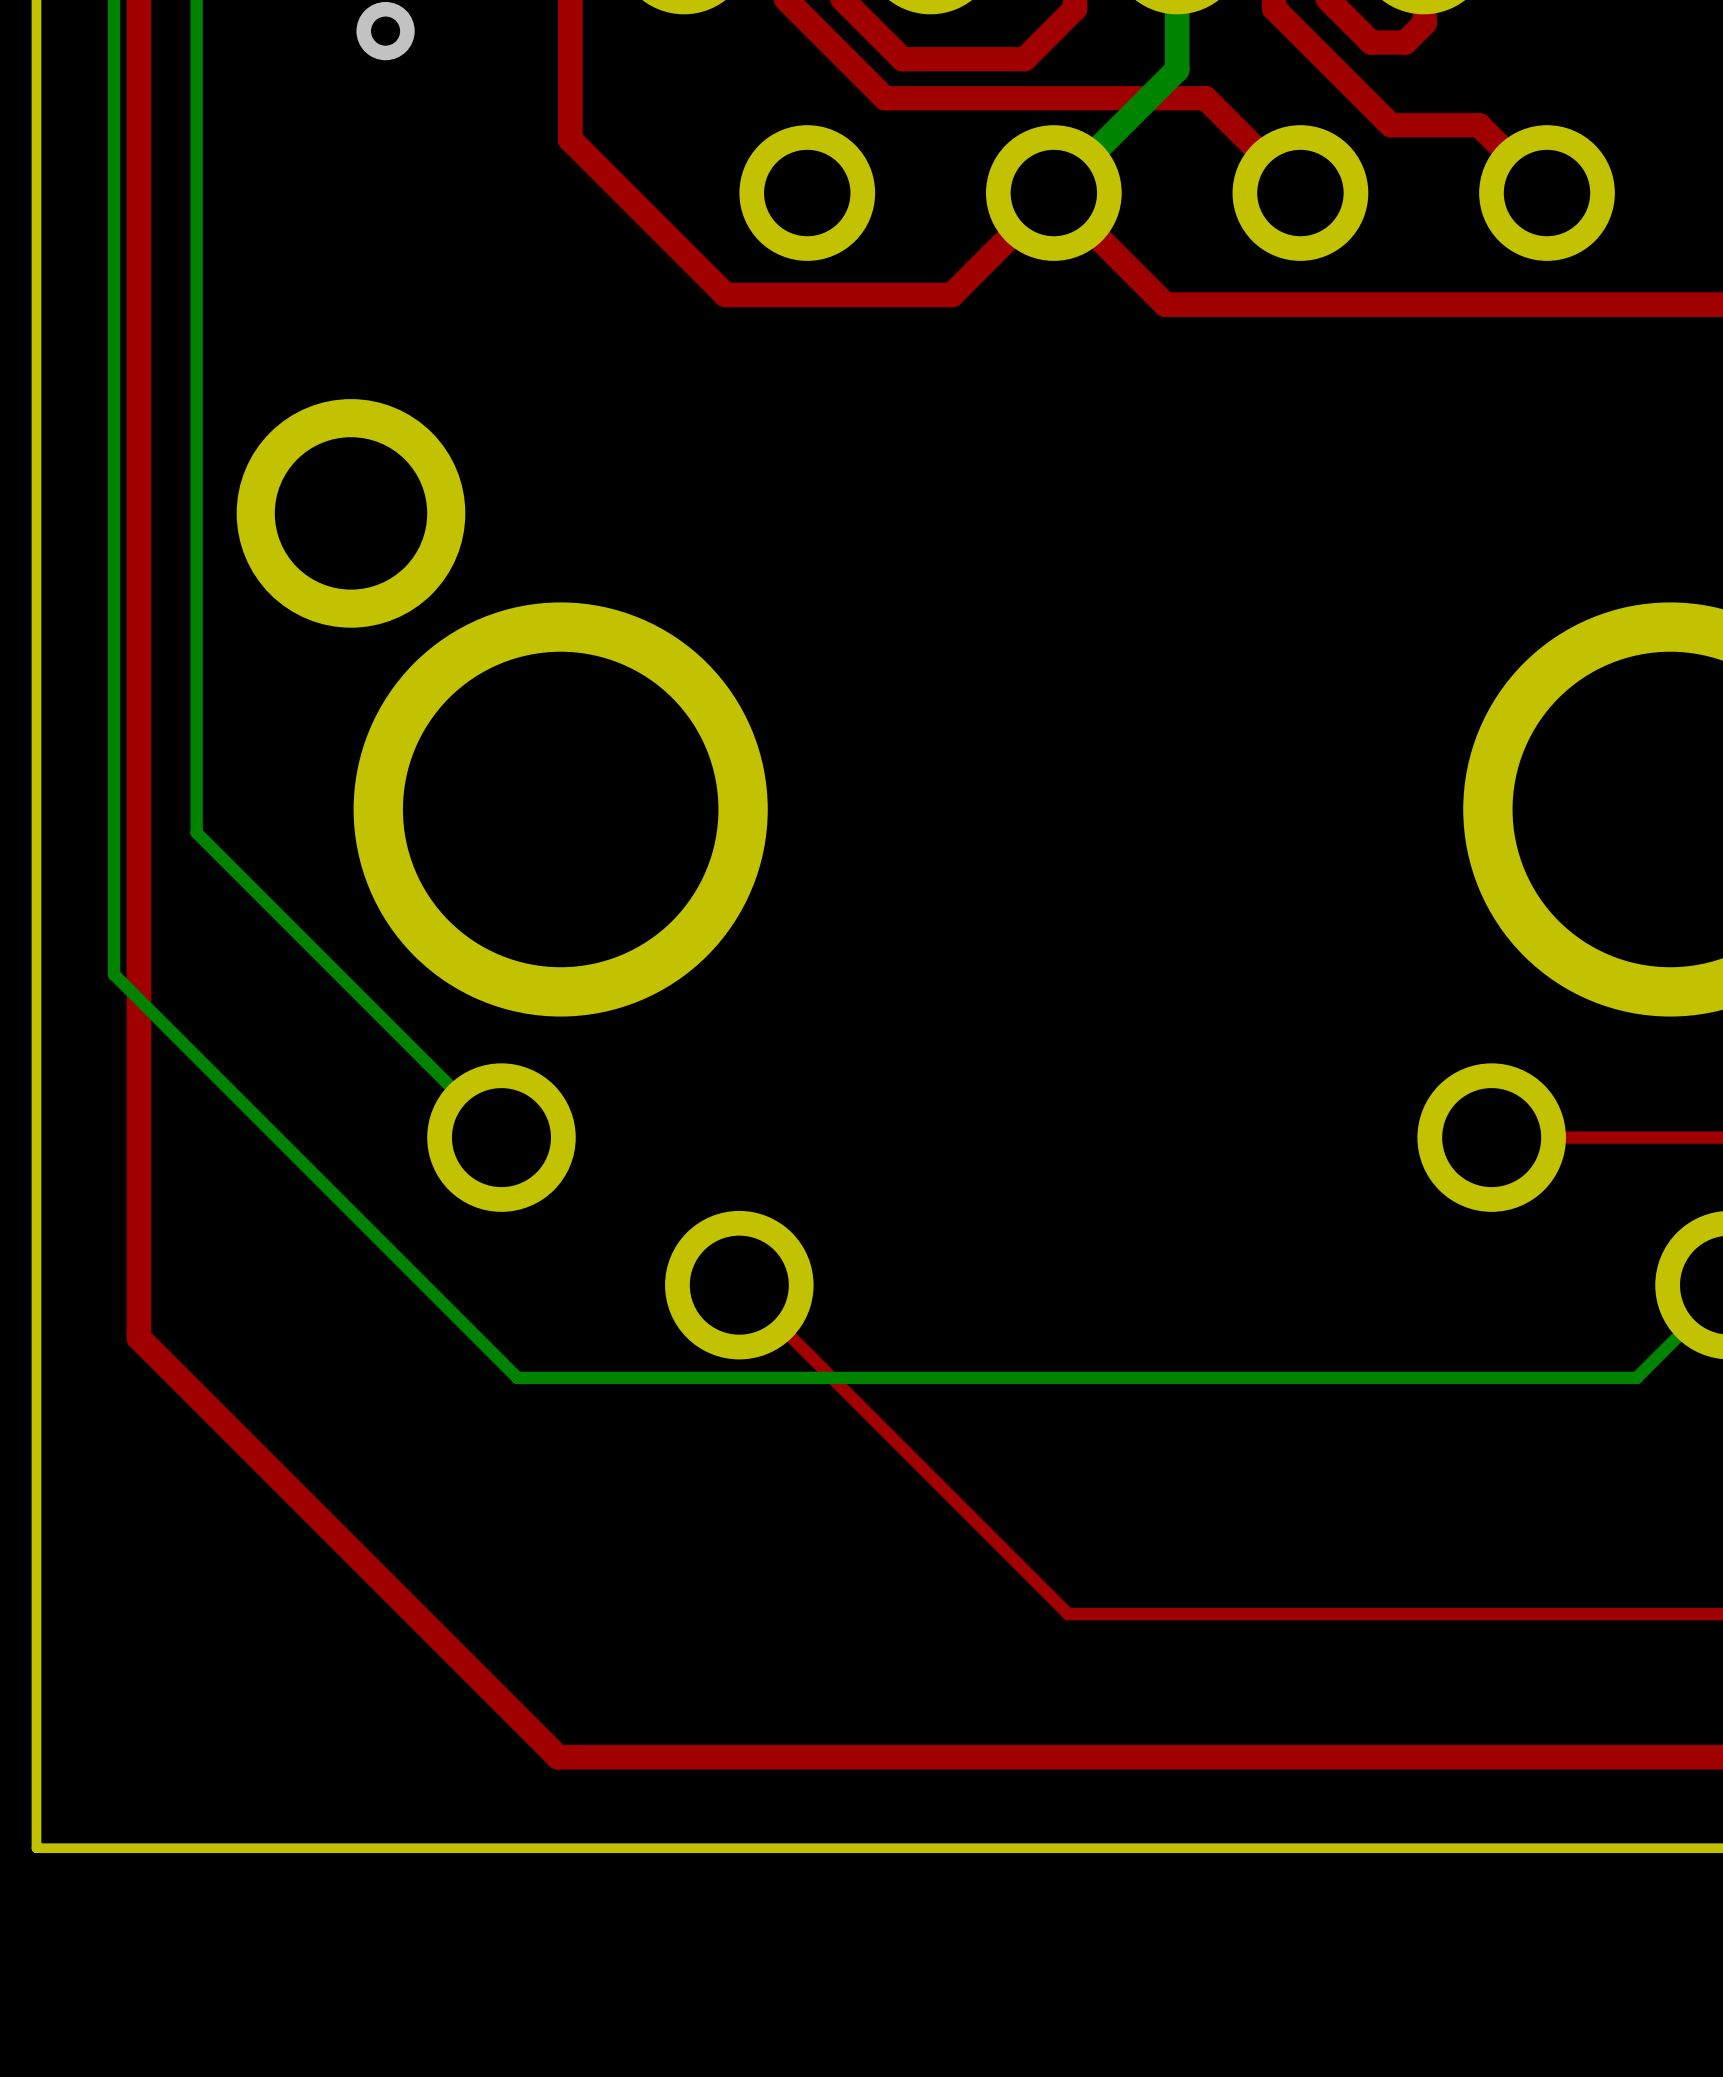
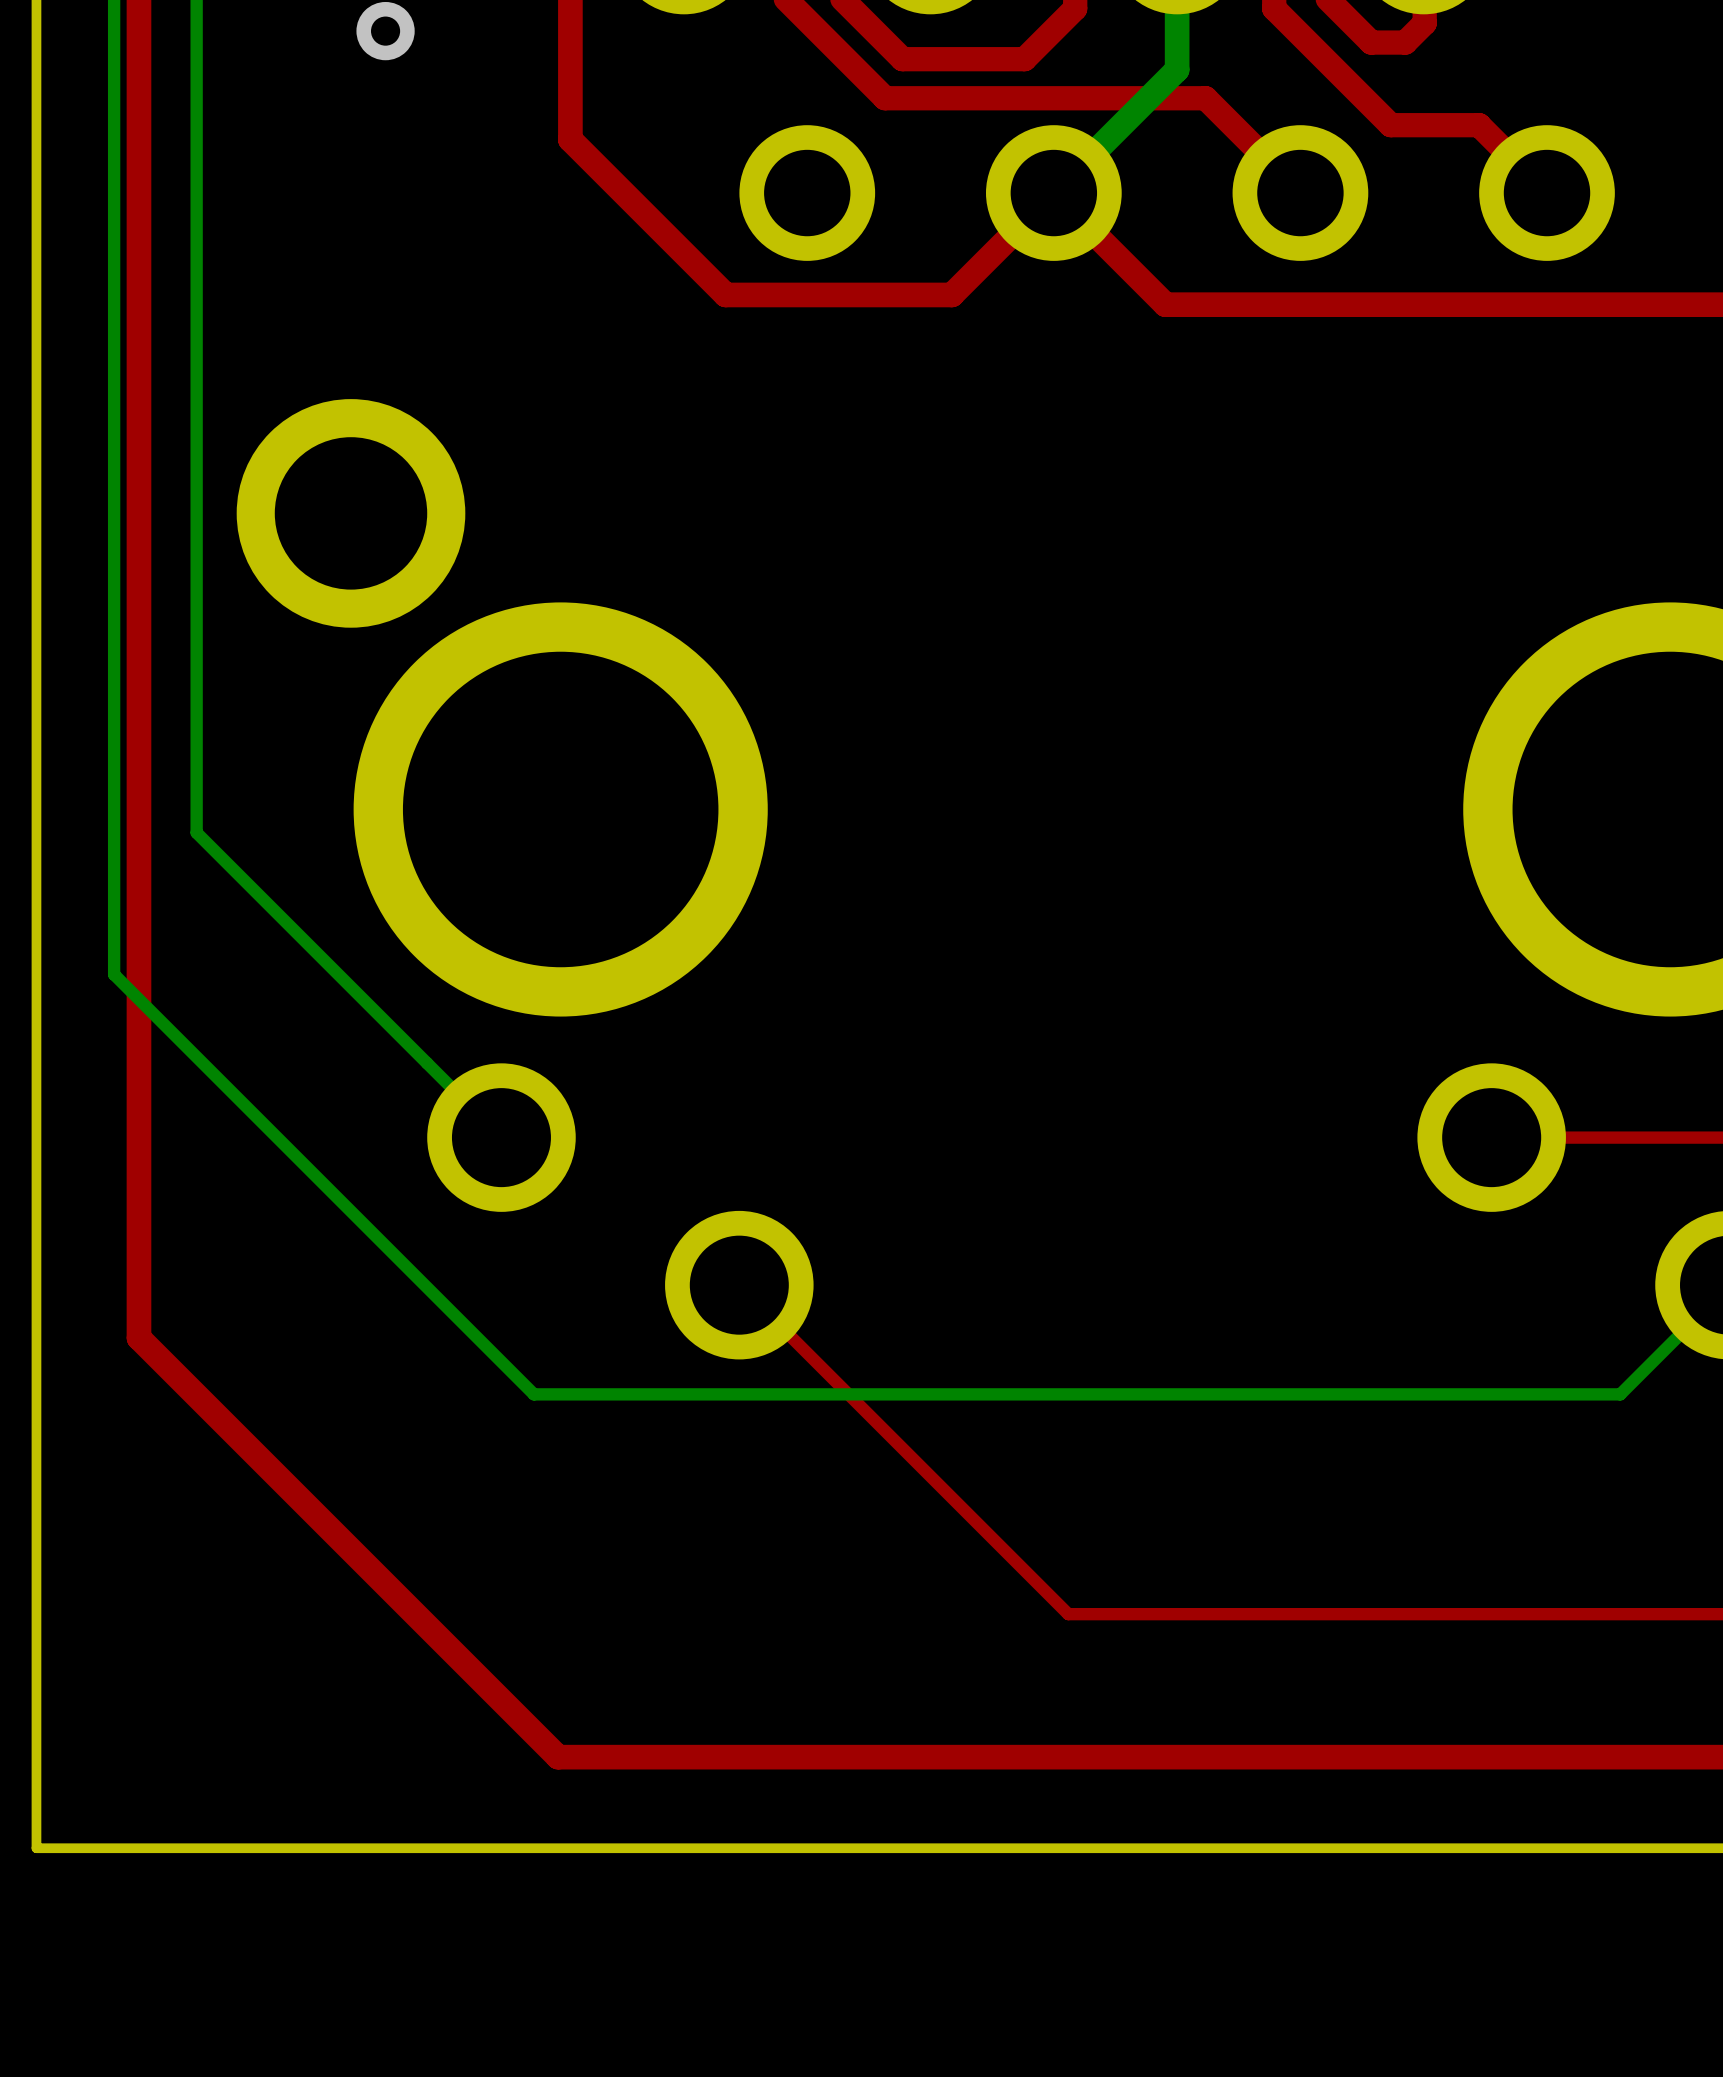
bottom track: (1636, 1377) (517, 1377) -> (1636, 1377) (1620, 1394) (533, 1394) (517, 1377)

